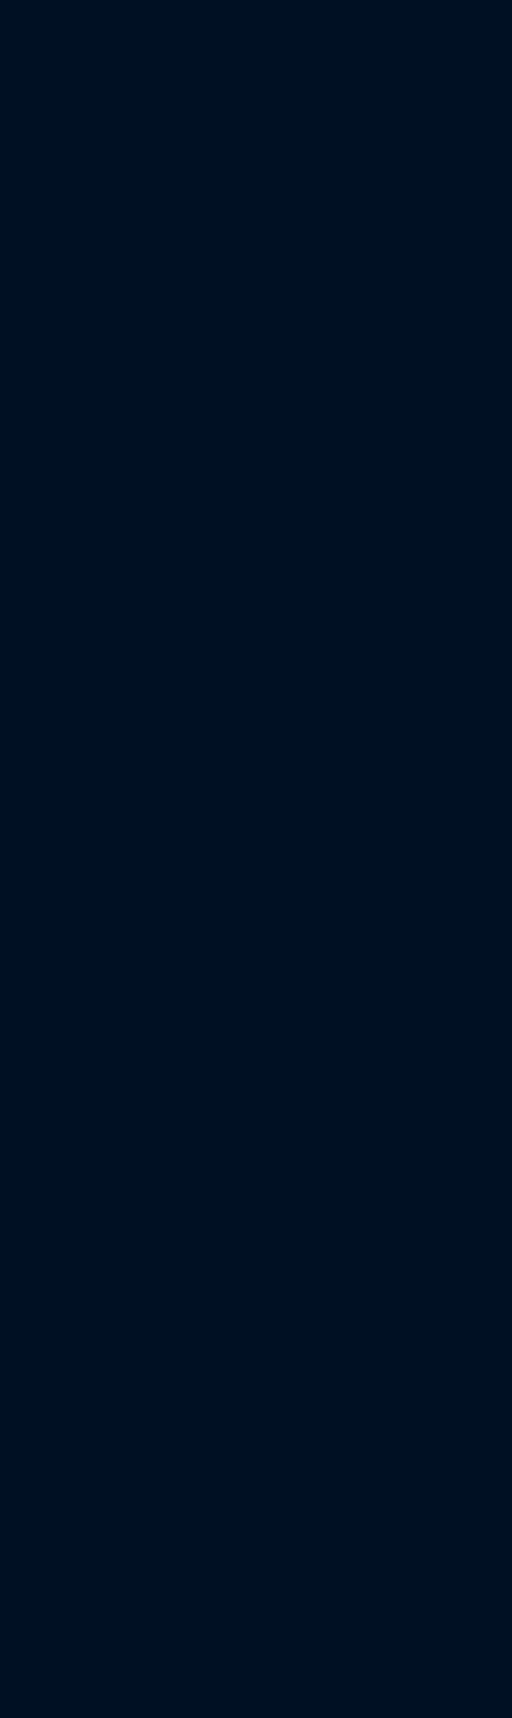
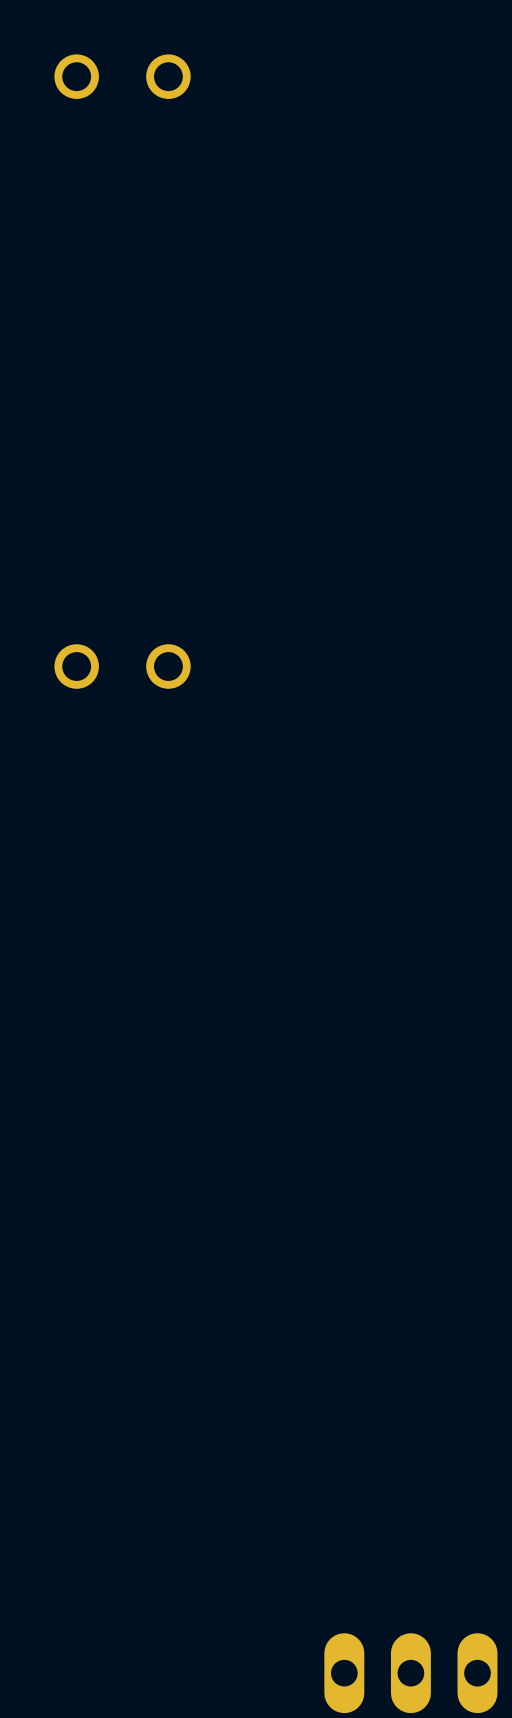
part: none -> (122, 76)
part: none -> (122, 666)
part: none -> (410, 1673)

